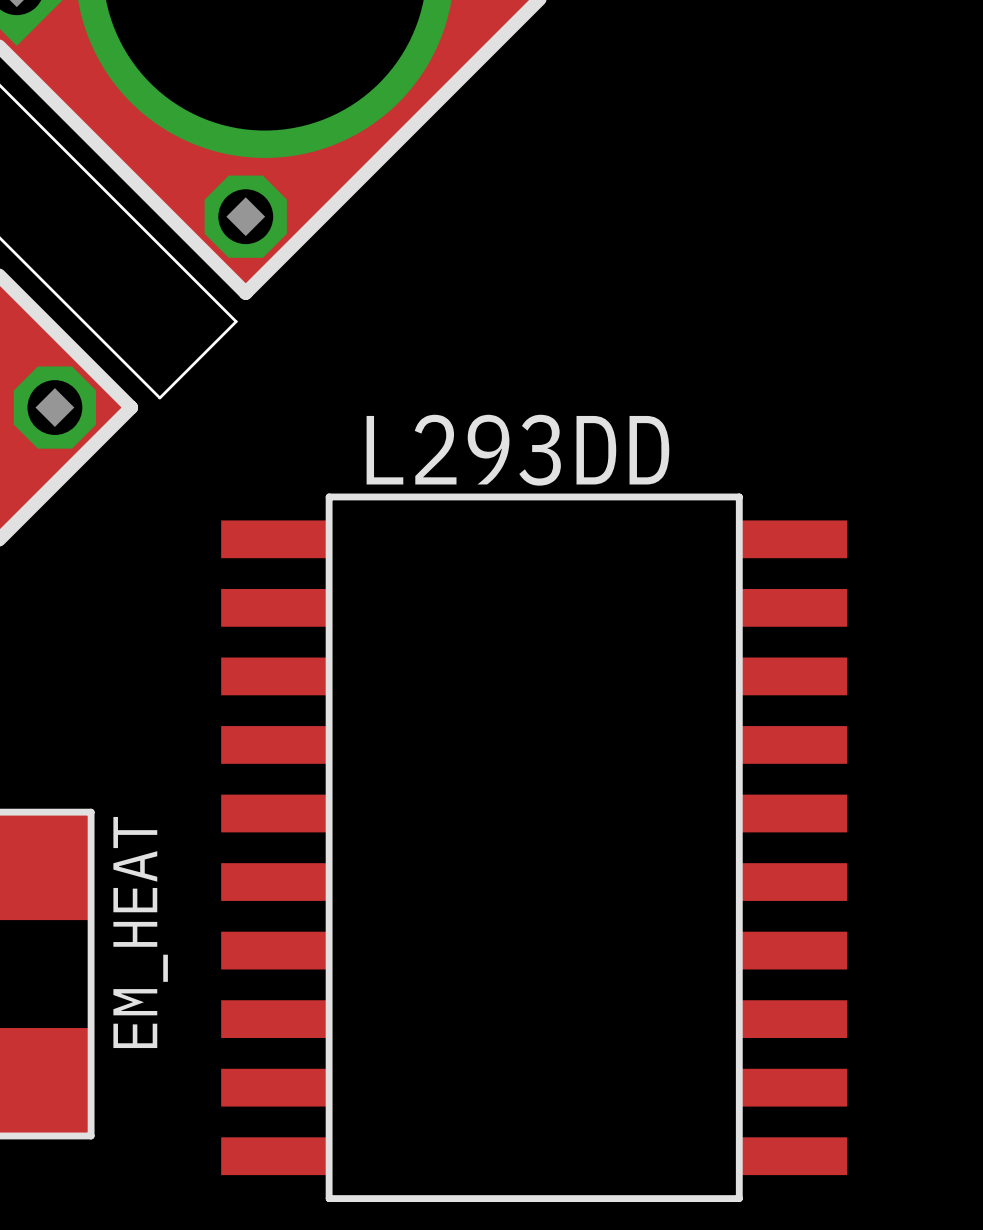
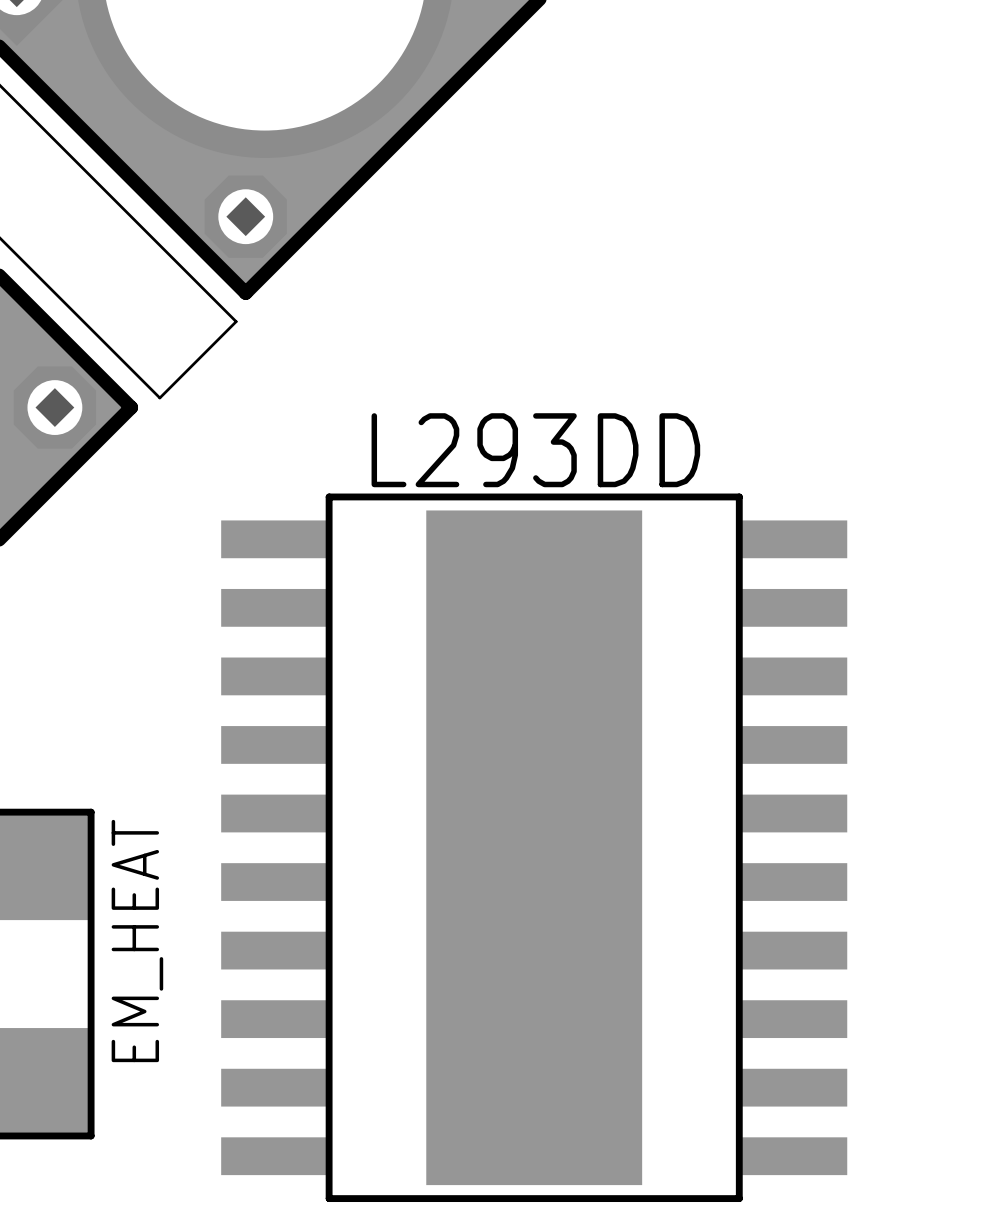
part footprint: [221, 493, 848, 1203] -> [221, 493, 848, 1203]

